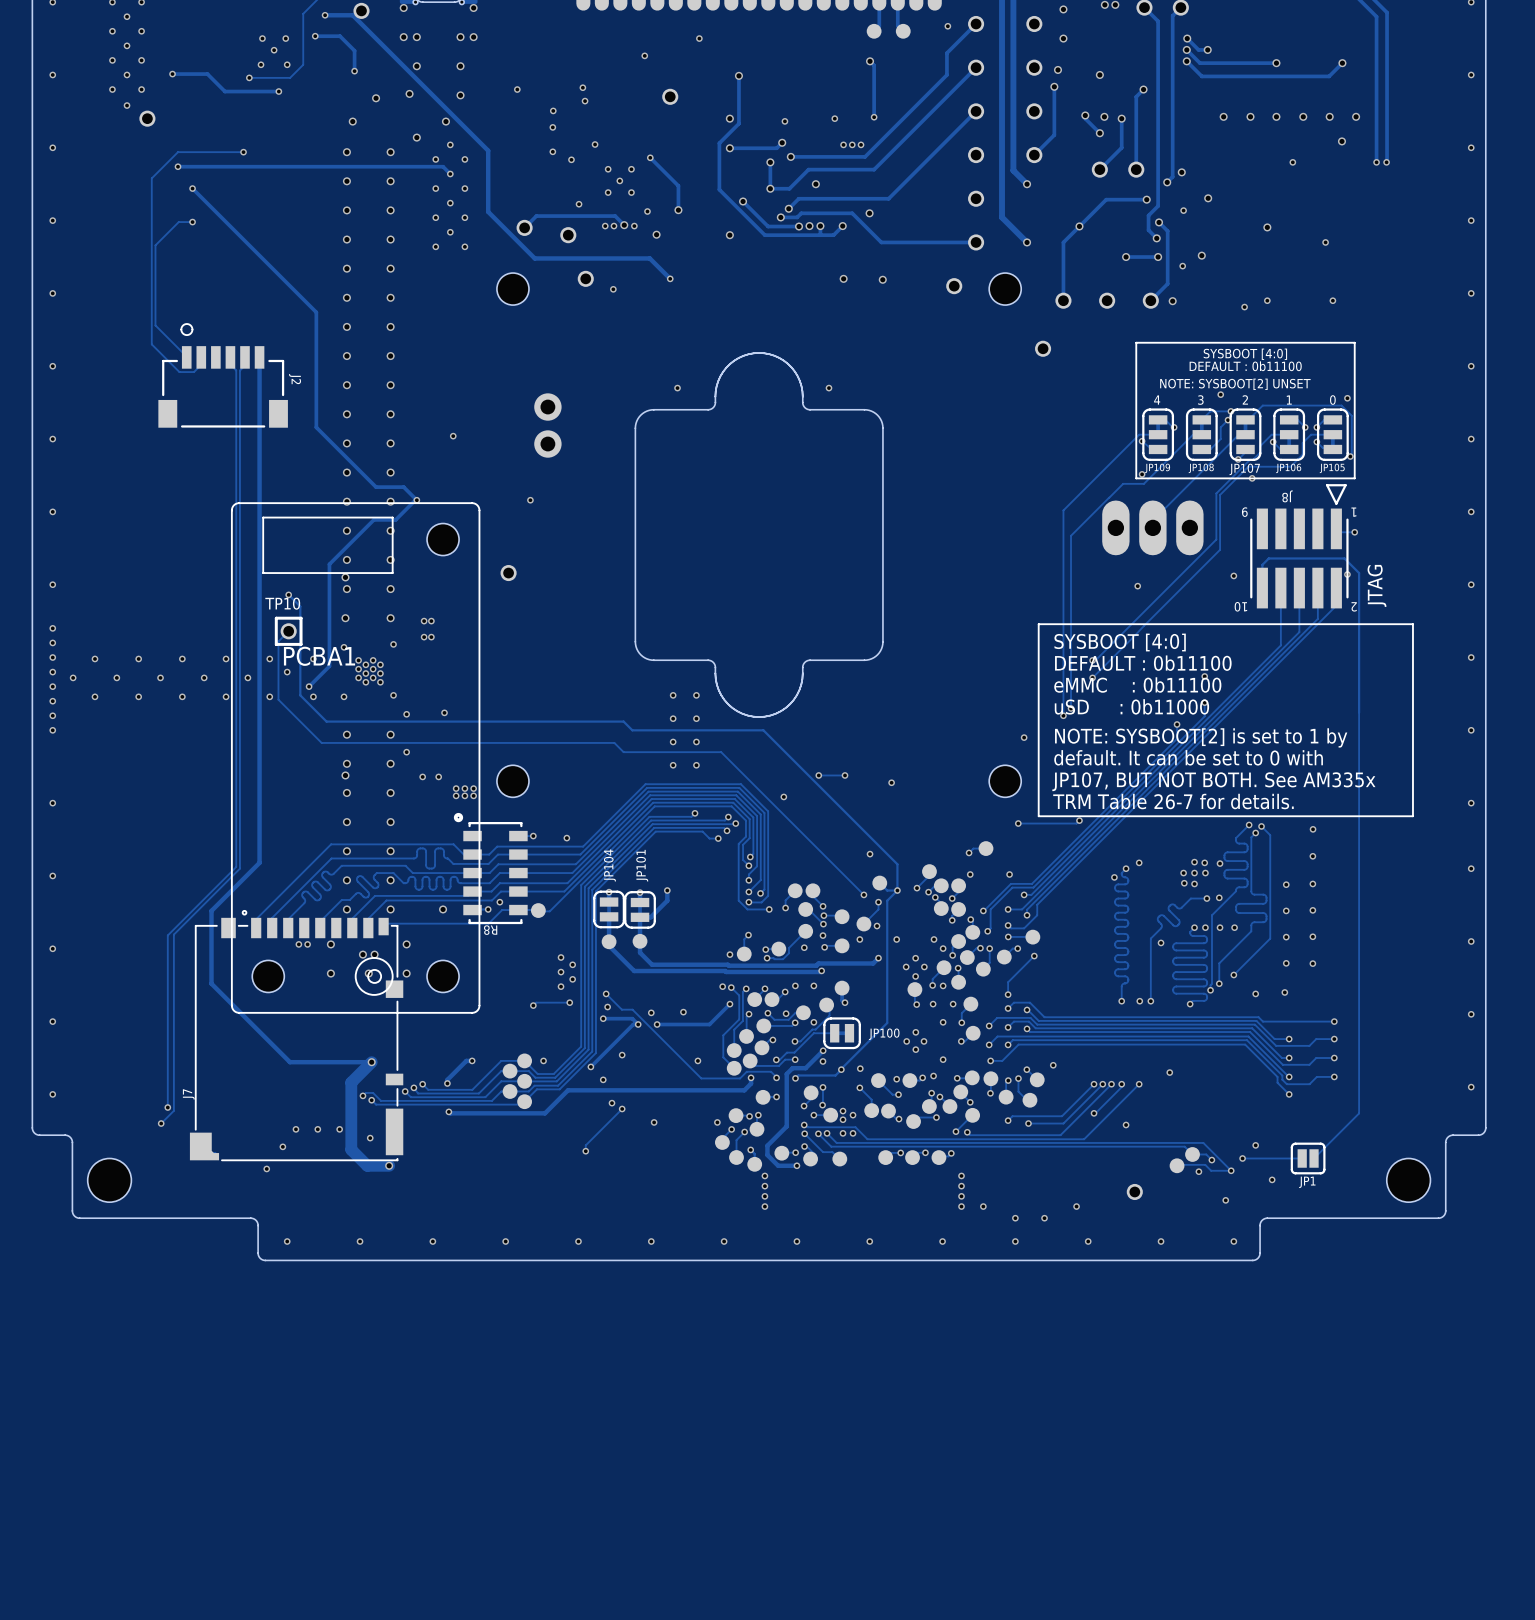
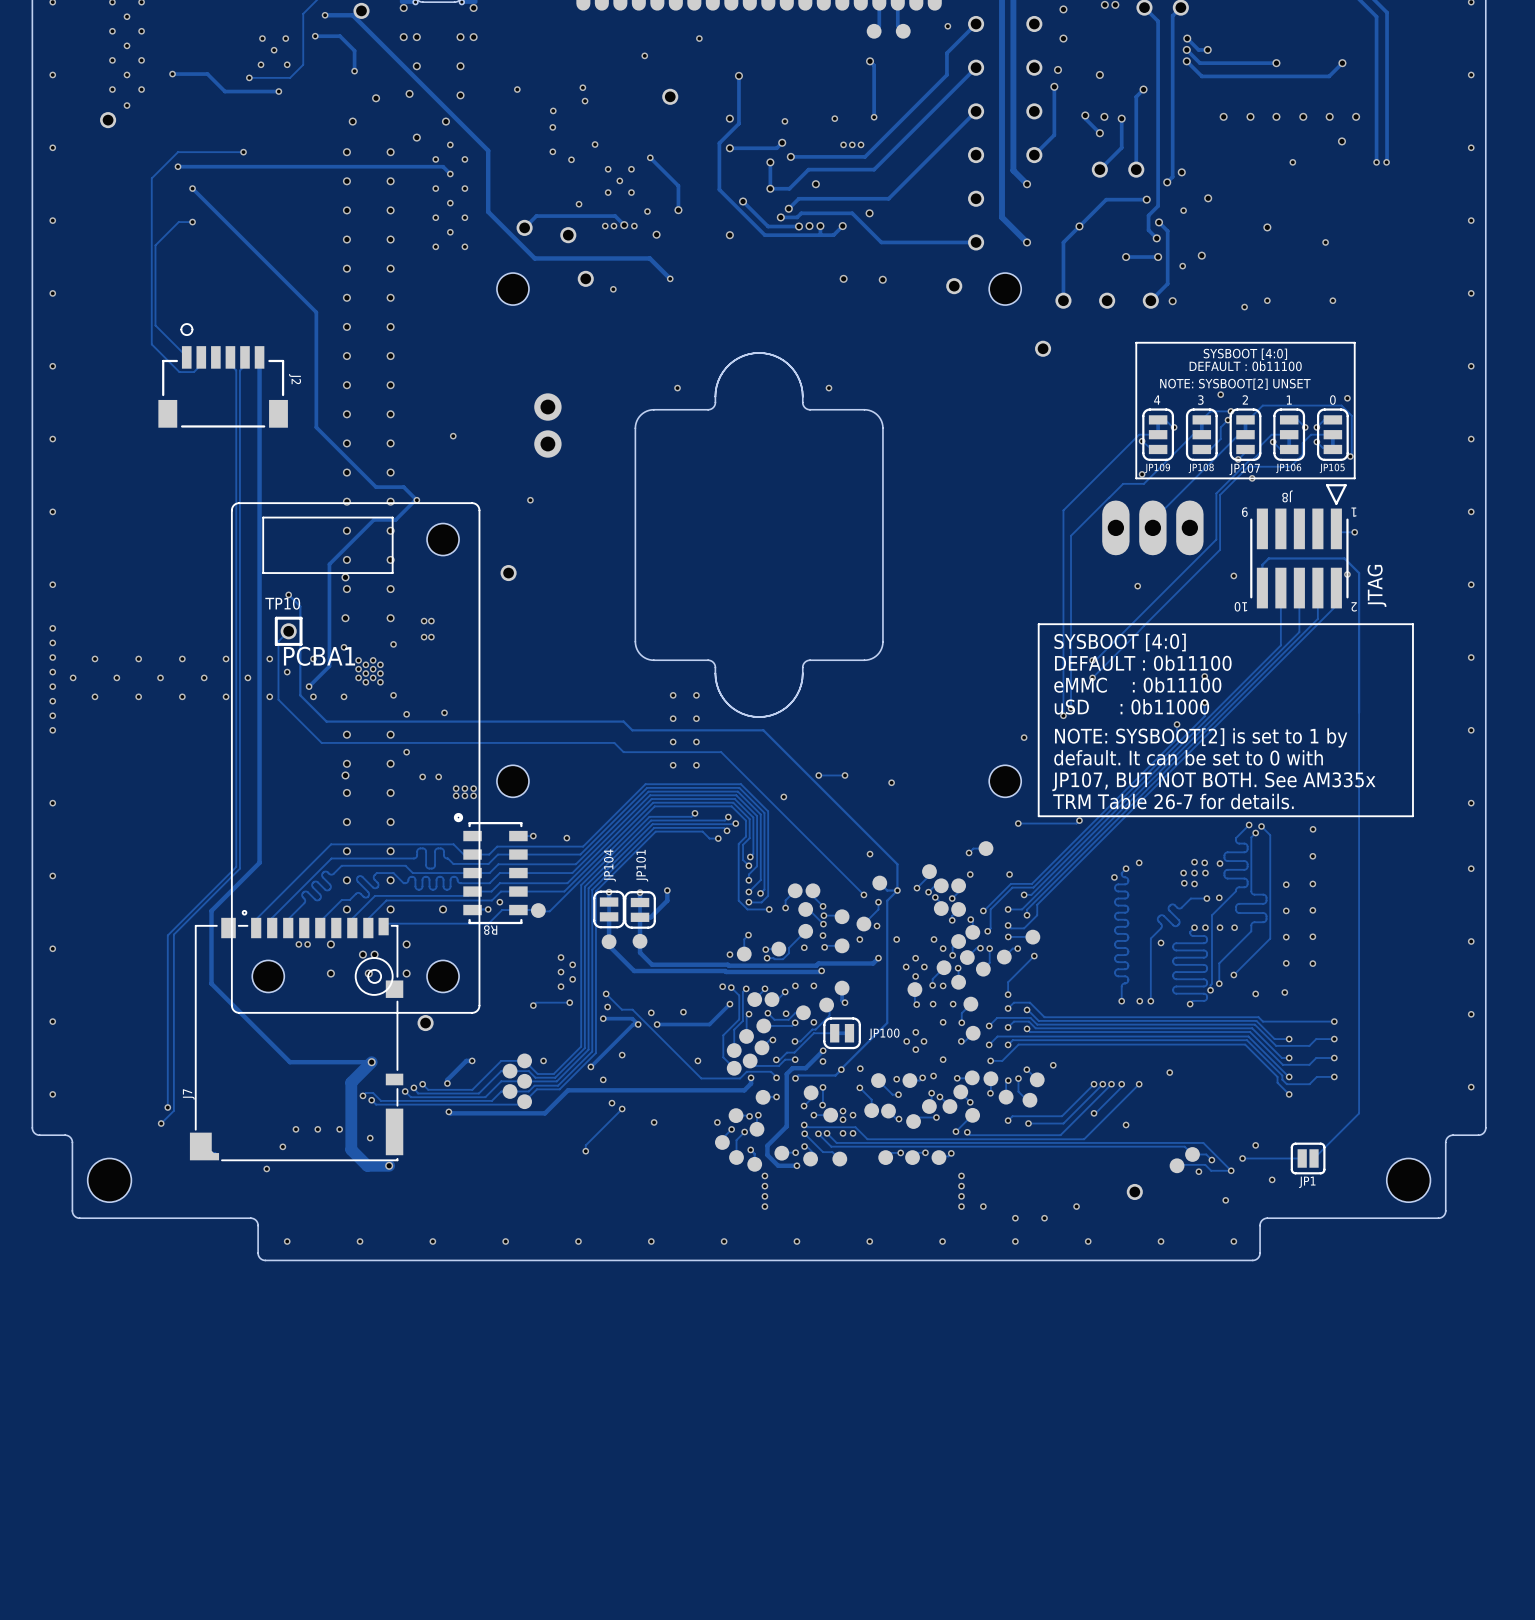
part position: (147, 118) -> (108, 120)
part: none -> (425, 1023)

